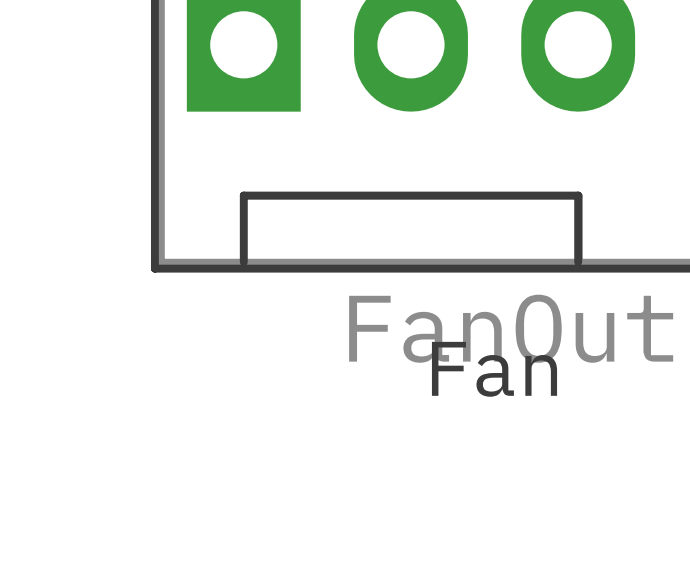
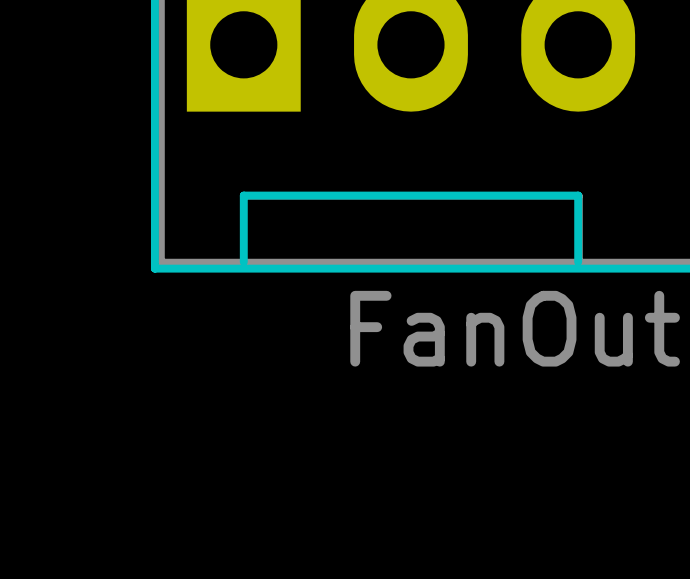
text: Fan (494, 369) -> none

